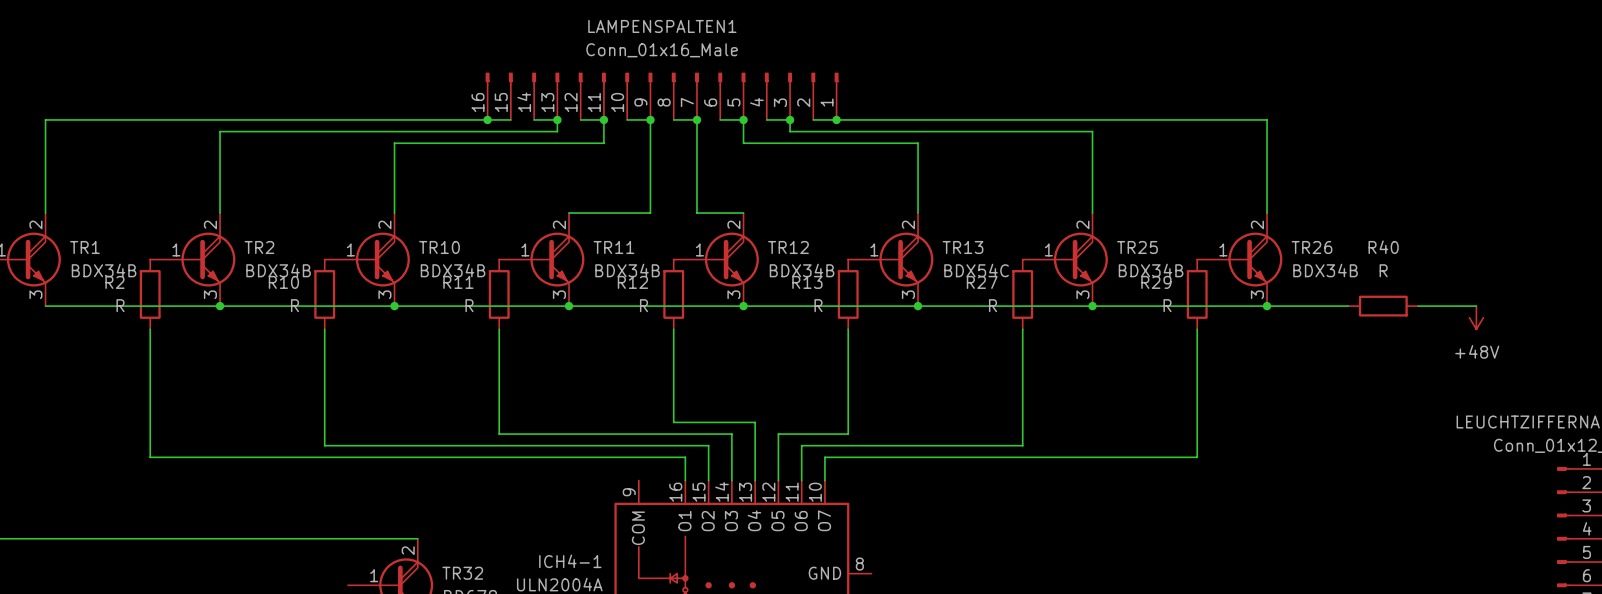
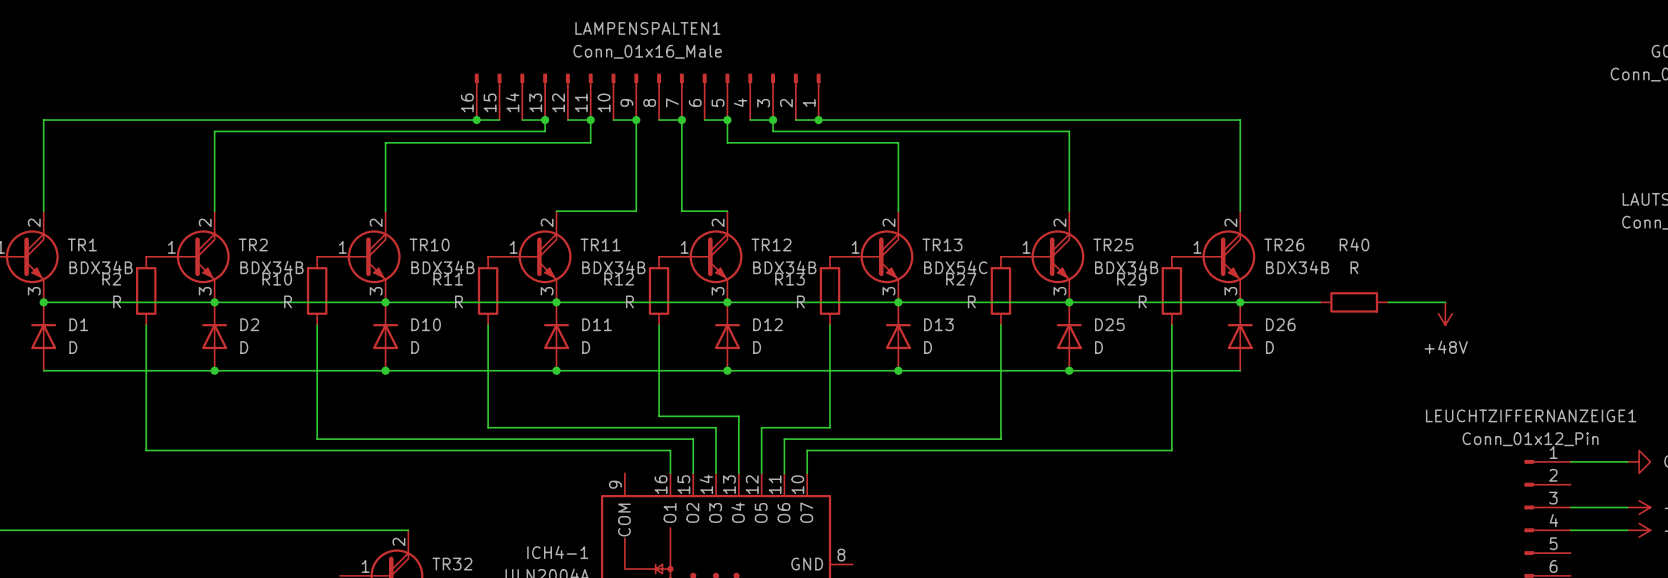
junction: none -> (43, 302)
D1: none -> D (43, 336)
D2: none -> D (214, 336)
D10: none -> D (385, 336)
D11: none -> D (556, 336)
D12: none -> D (727, 336)
D13: none -> D (898, 336)
D25: none -> D (1069, 336)
D26: none -> D (1240, 336)
wire: none -> (43, 370) (1240, 370)
junction: none -> (214, 370)
junction: none -> (385, 370)
junction: none -> (556, 370)
junction: none -> (727, 370)
junction: none -> (898, 370)
junction: none -> (1069, 370)

